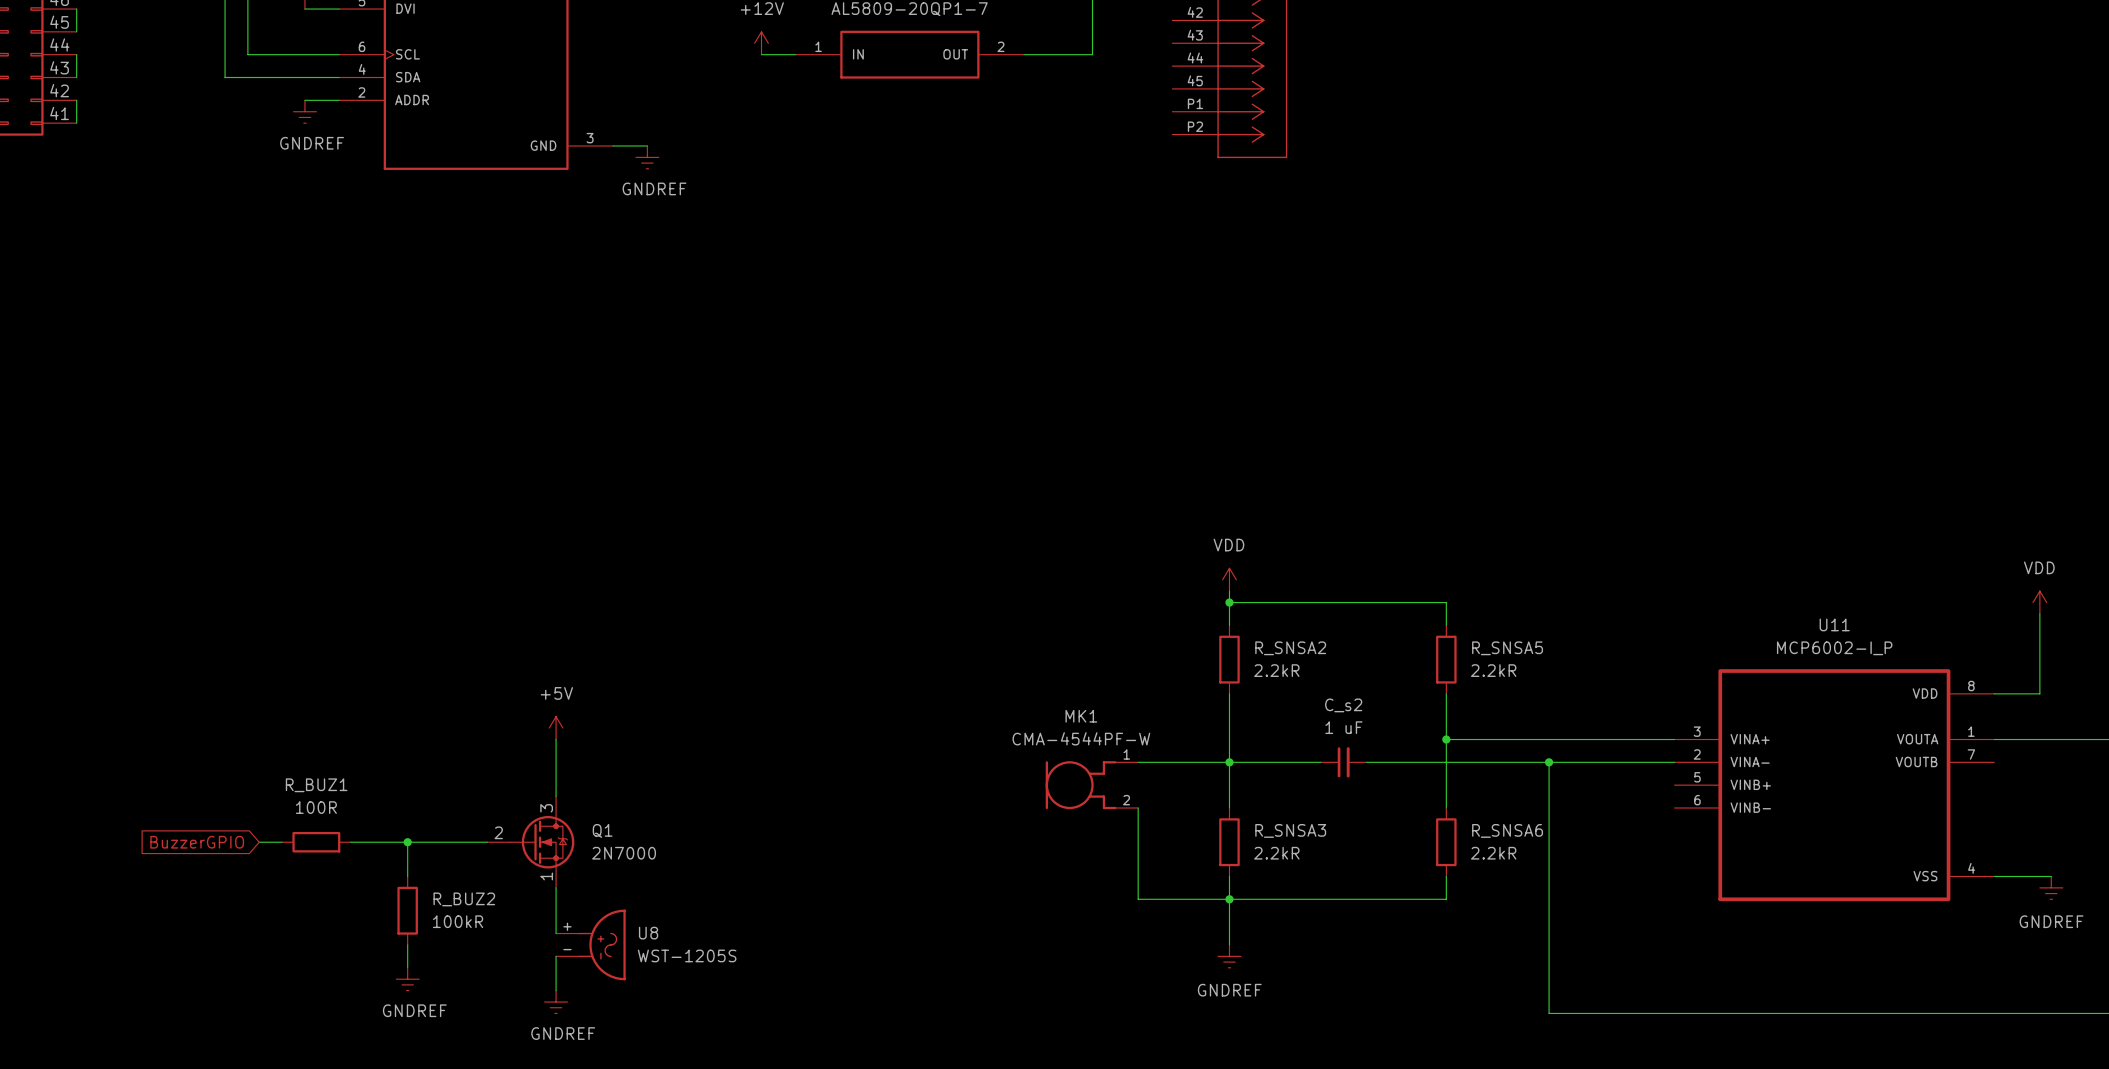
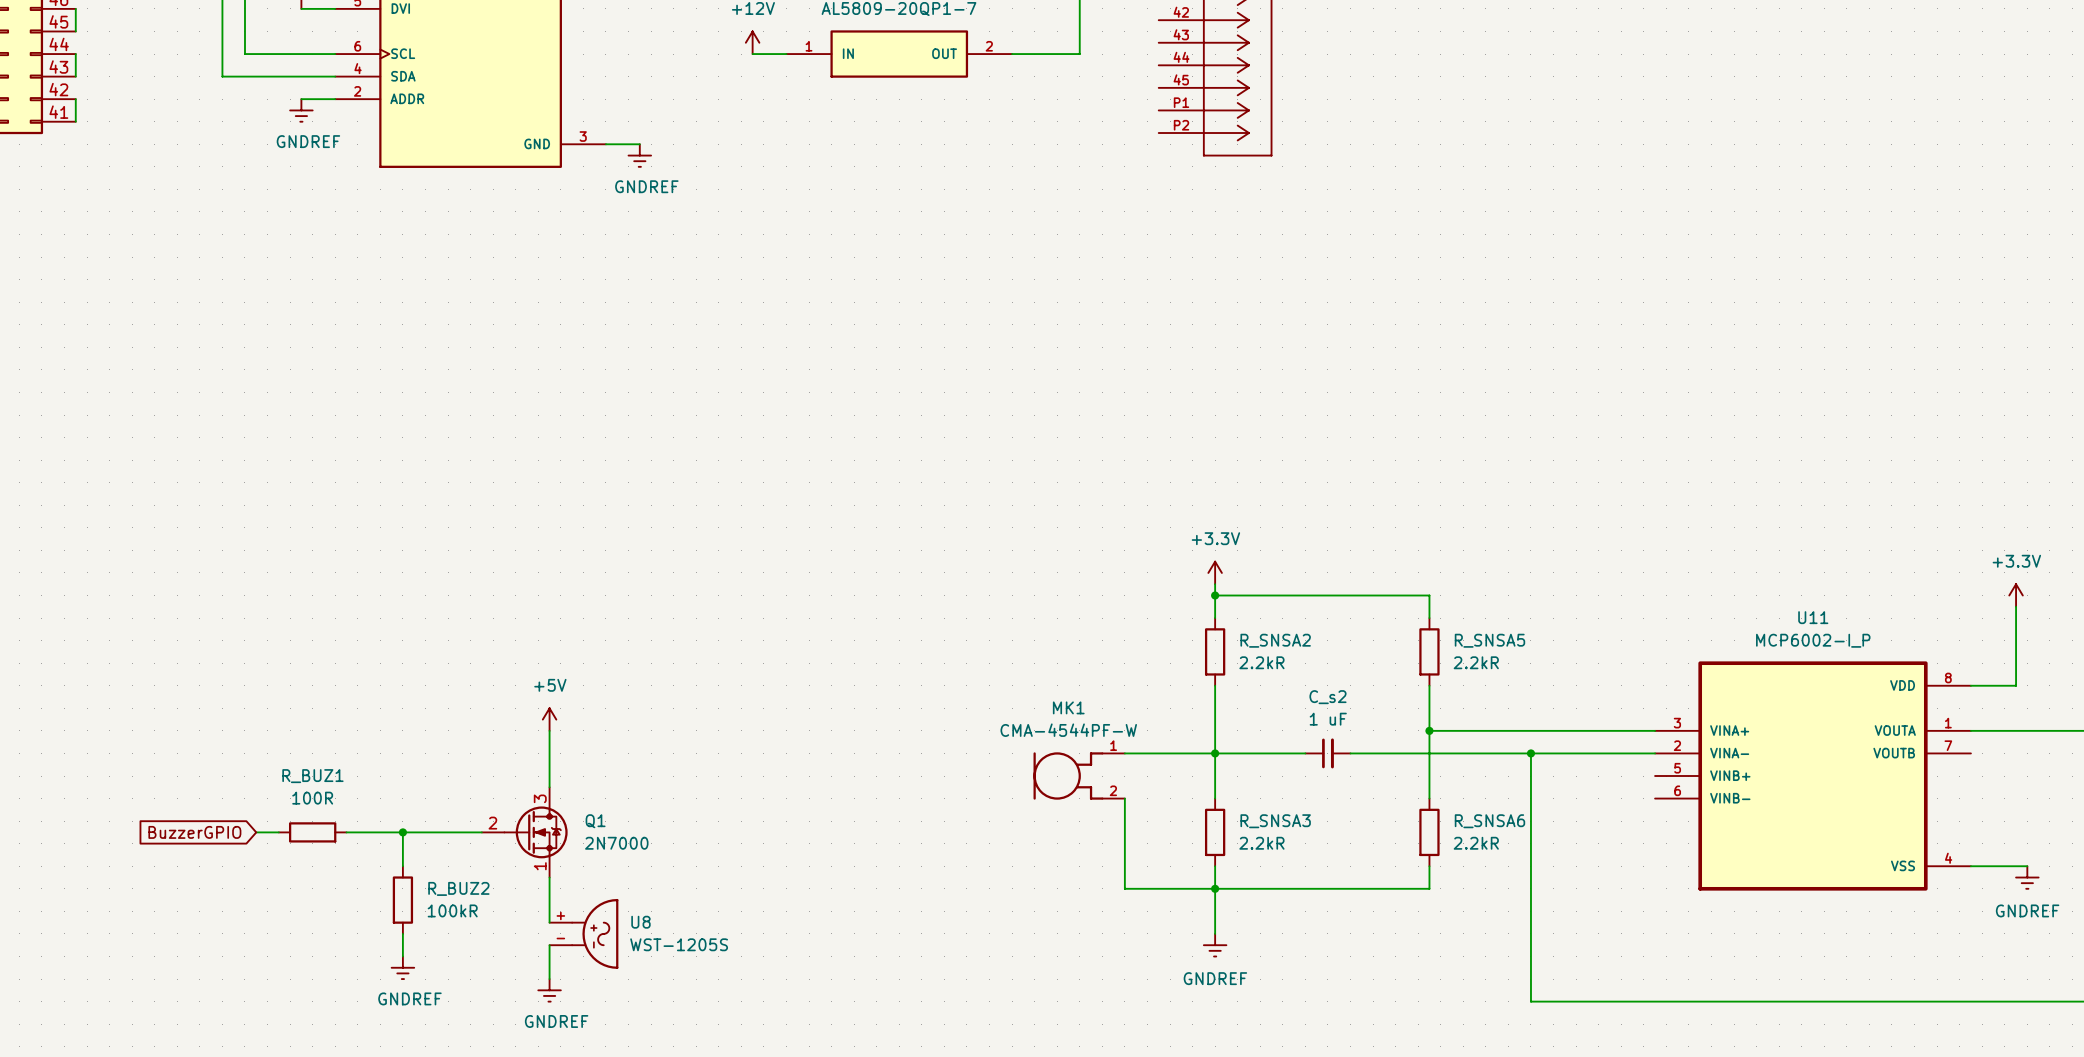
power symbol: VDD (1229, 579) -> +3.3V (1215, 572)
power symbol: VDD (2039, 602) -> +3.3V (2016, 595)

